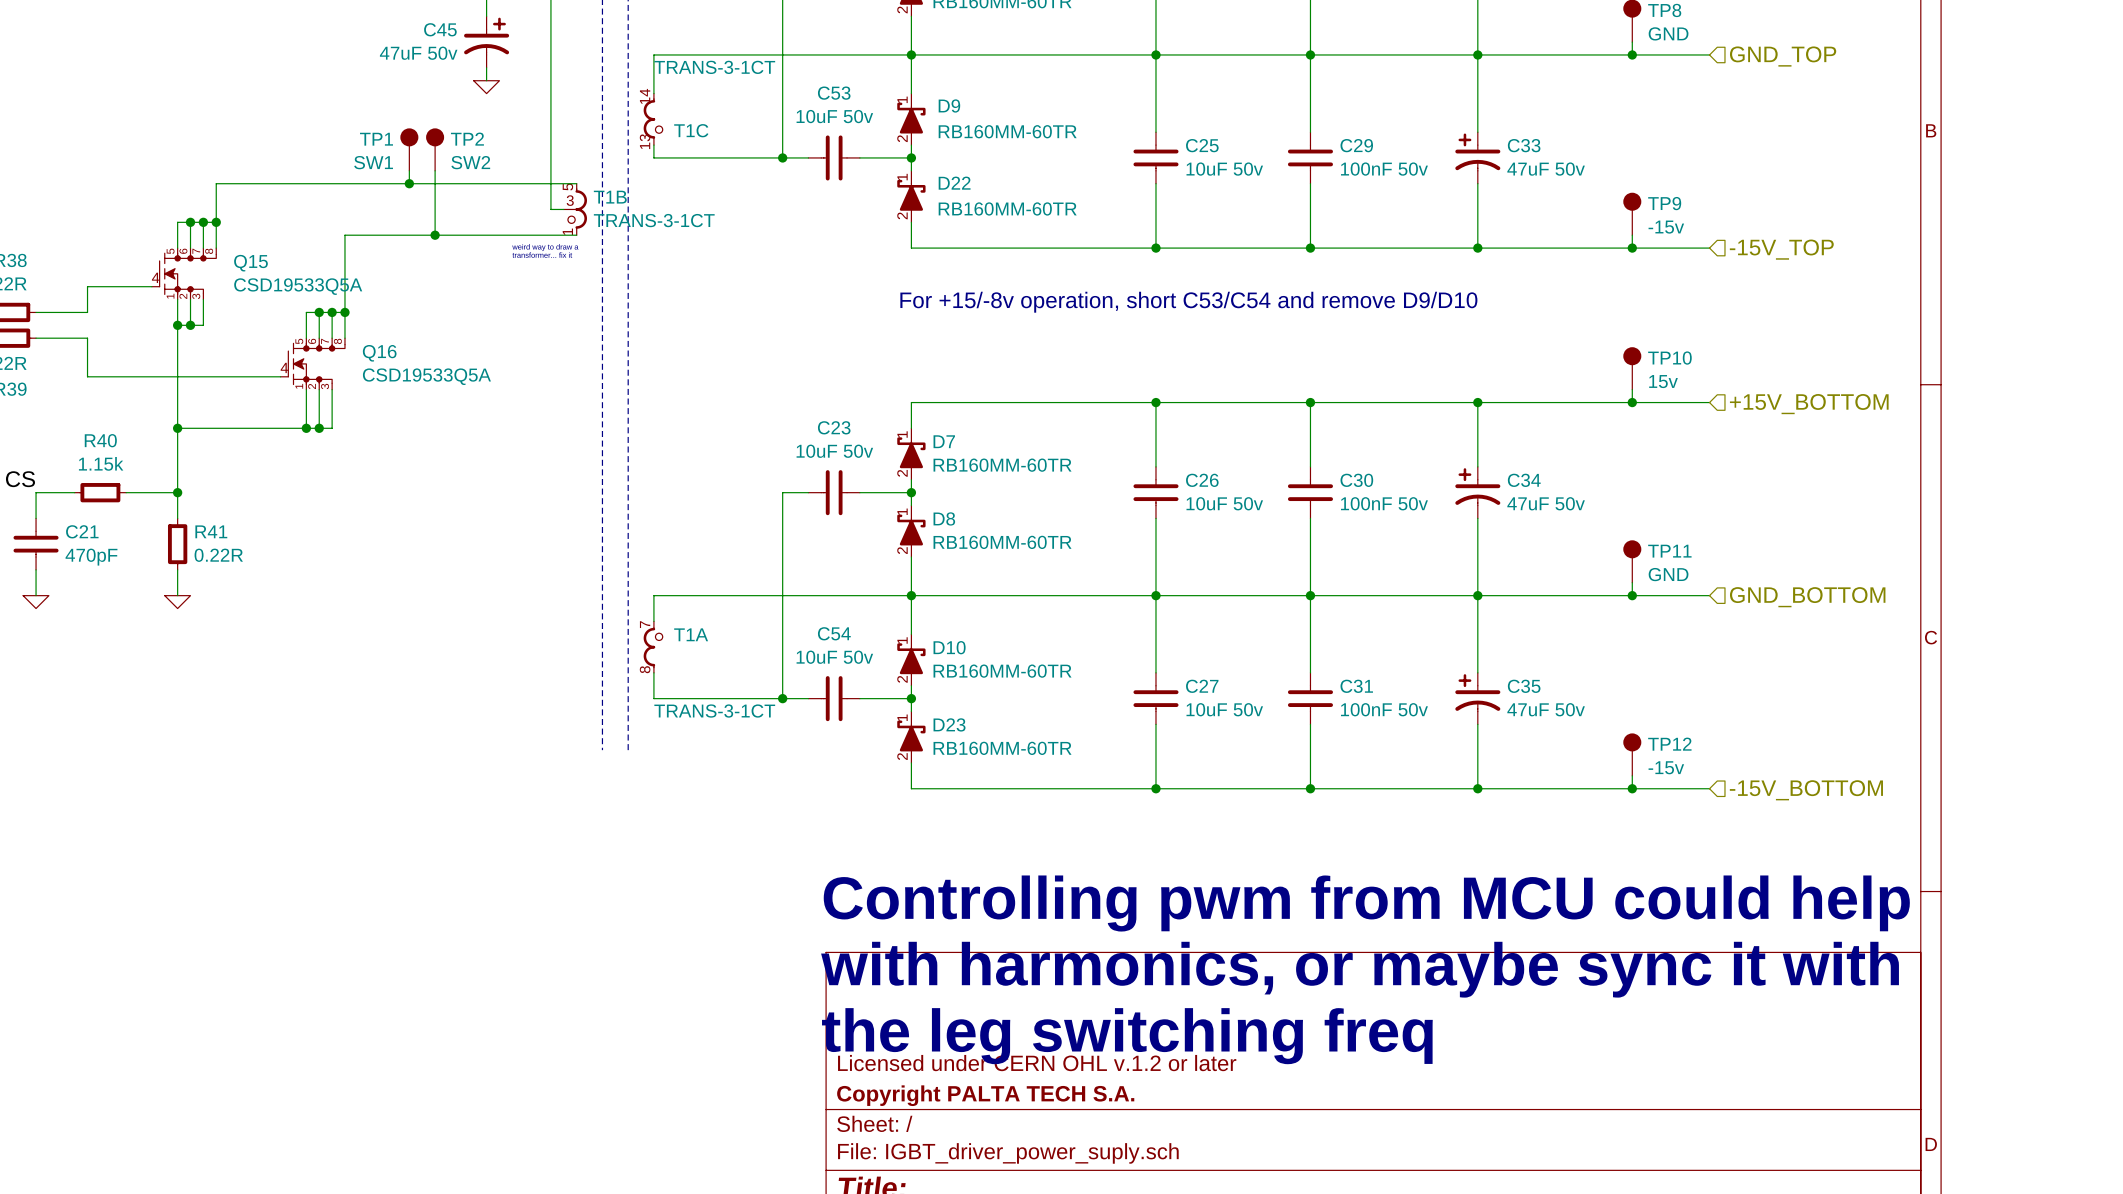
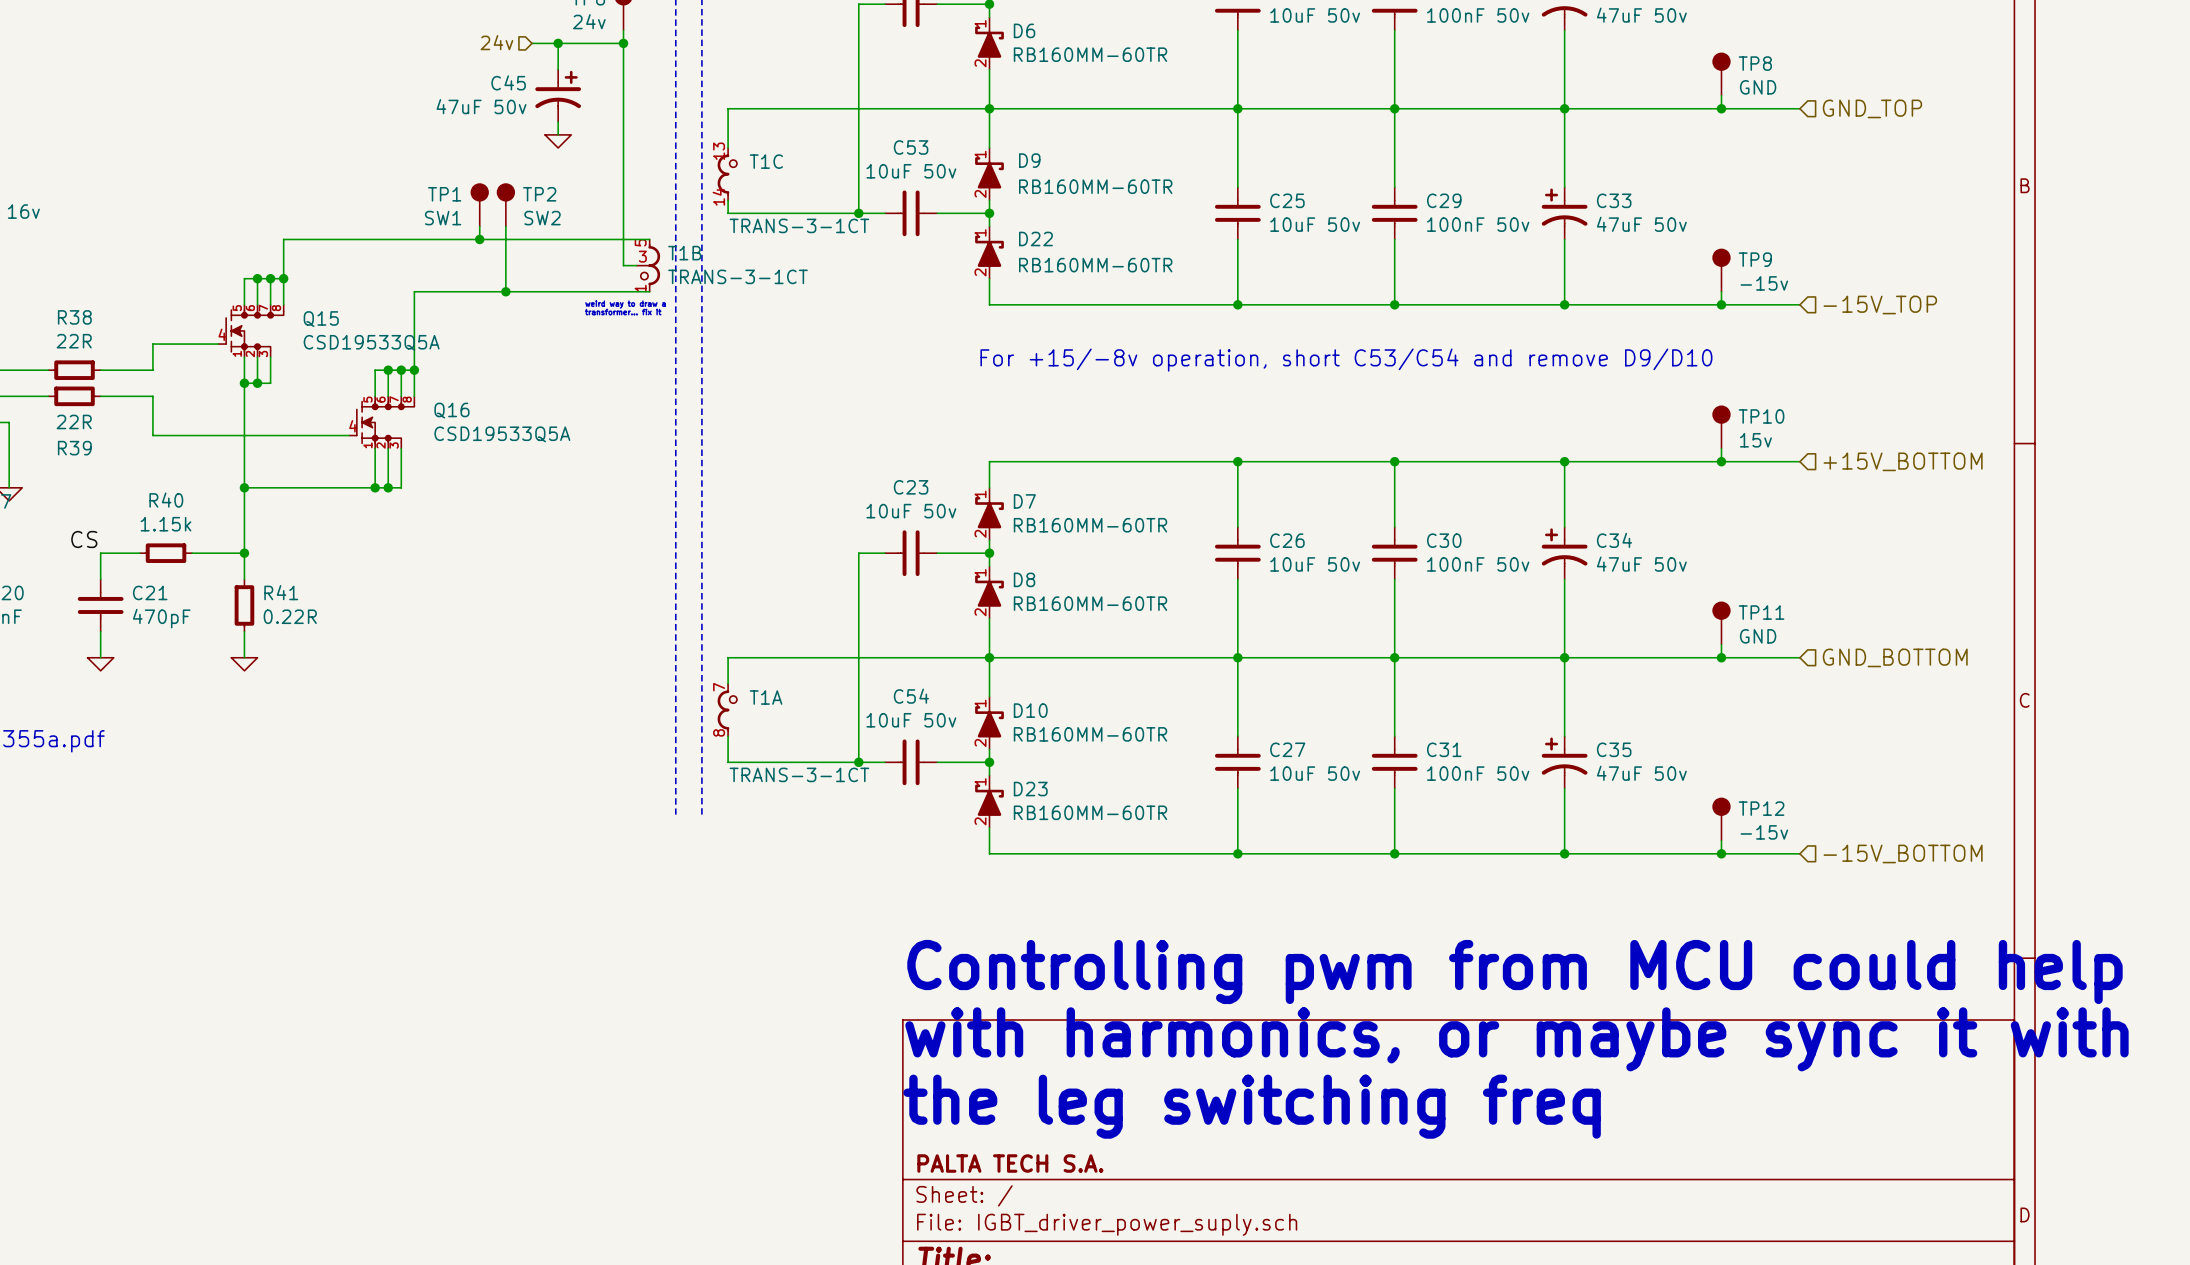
T1C flip: as is (653, 118) -> up-down (727, 174)
title block: Licensed under CERN OHL v.1.2 or later (1037, 1063) -> none
title block: Copyright PALTA TECH S.A. (985, 1095) -> PALTA TECH S.A. (1010, 1163)

